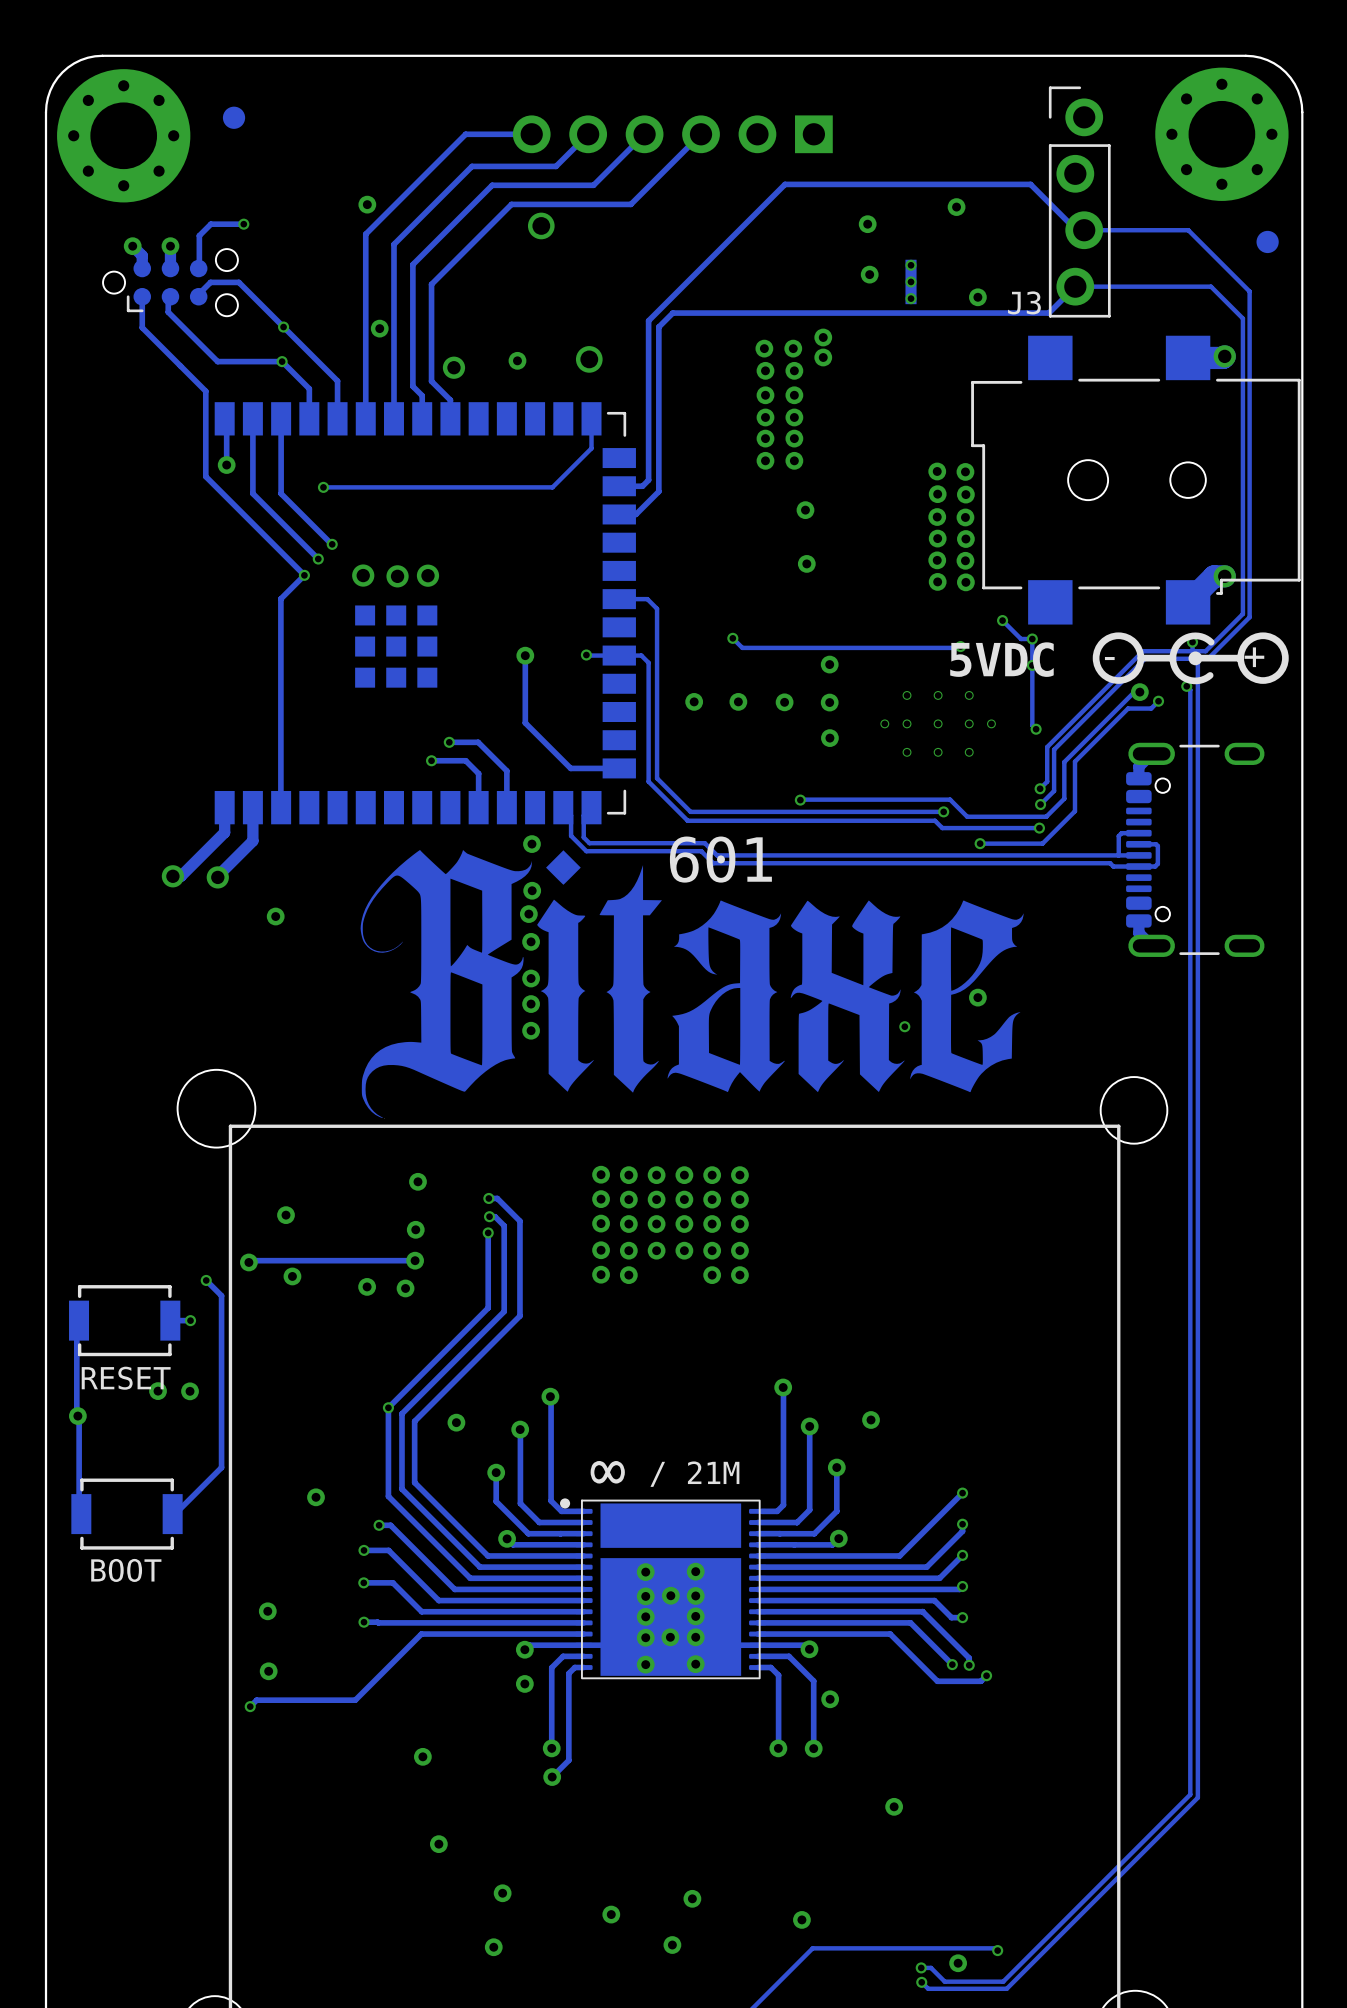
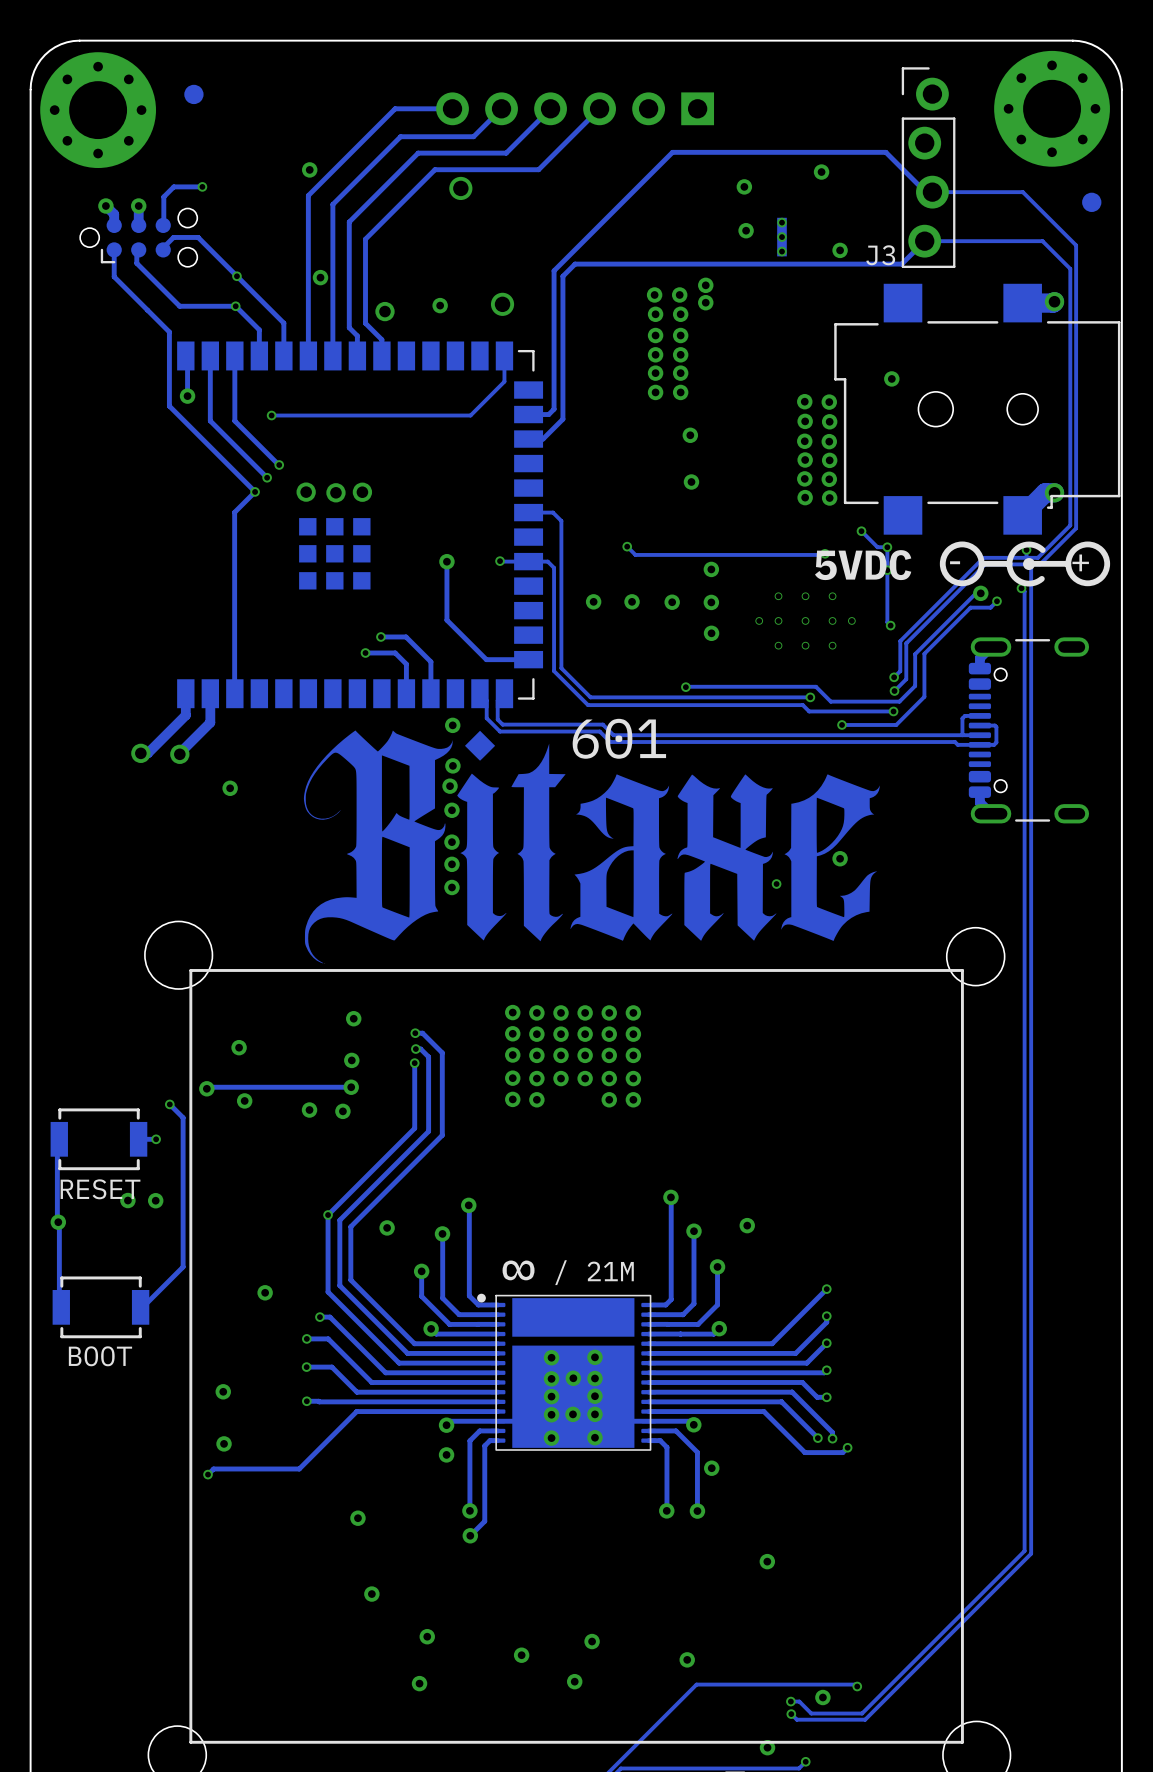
via: none -> (891, 378)

